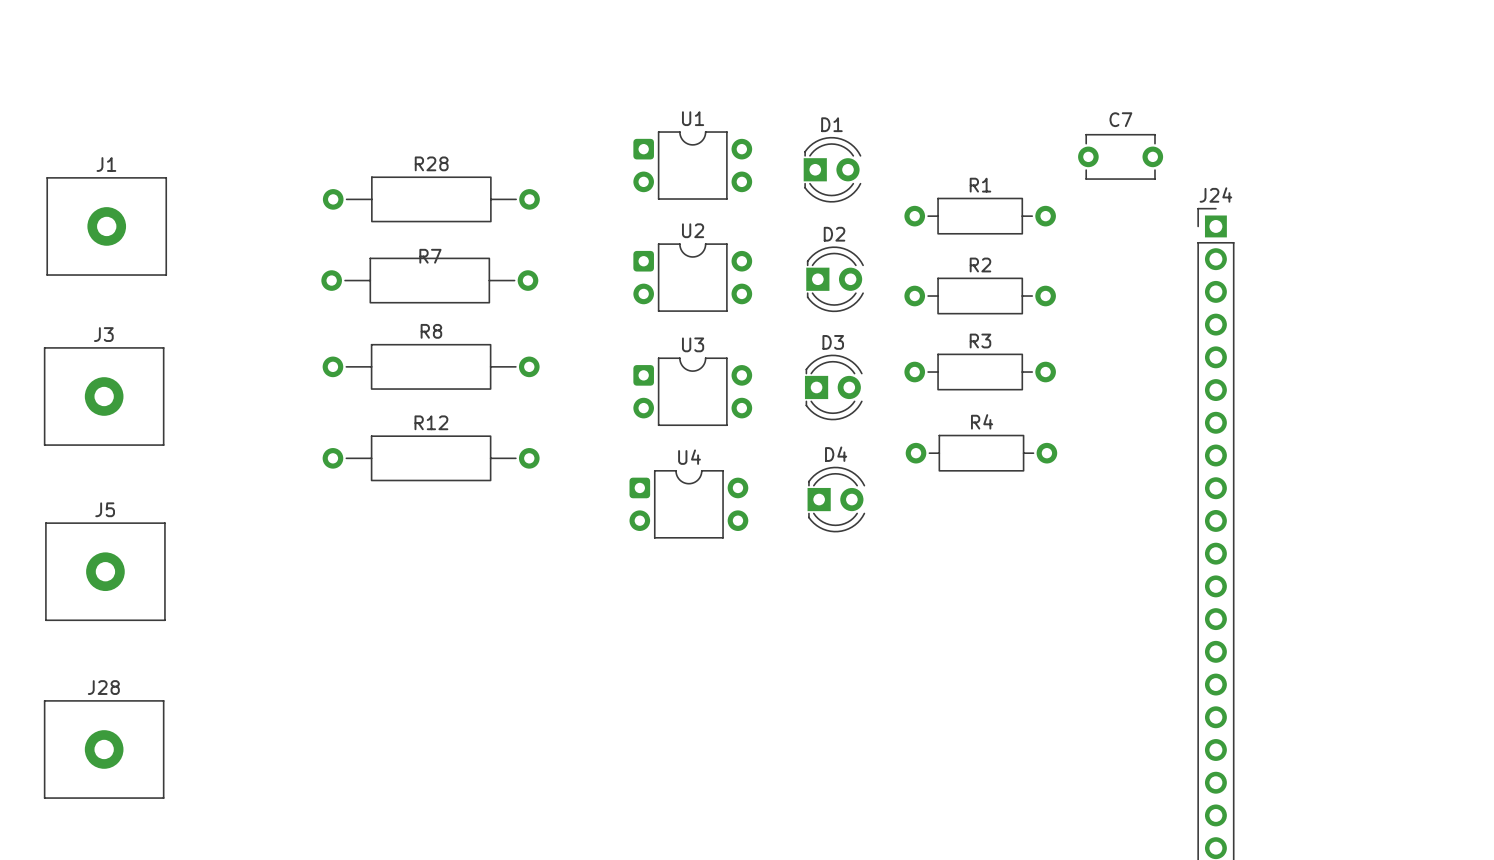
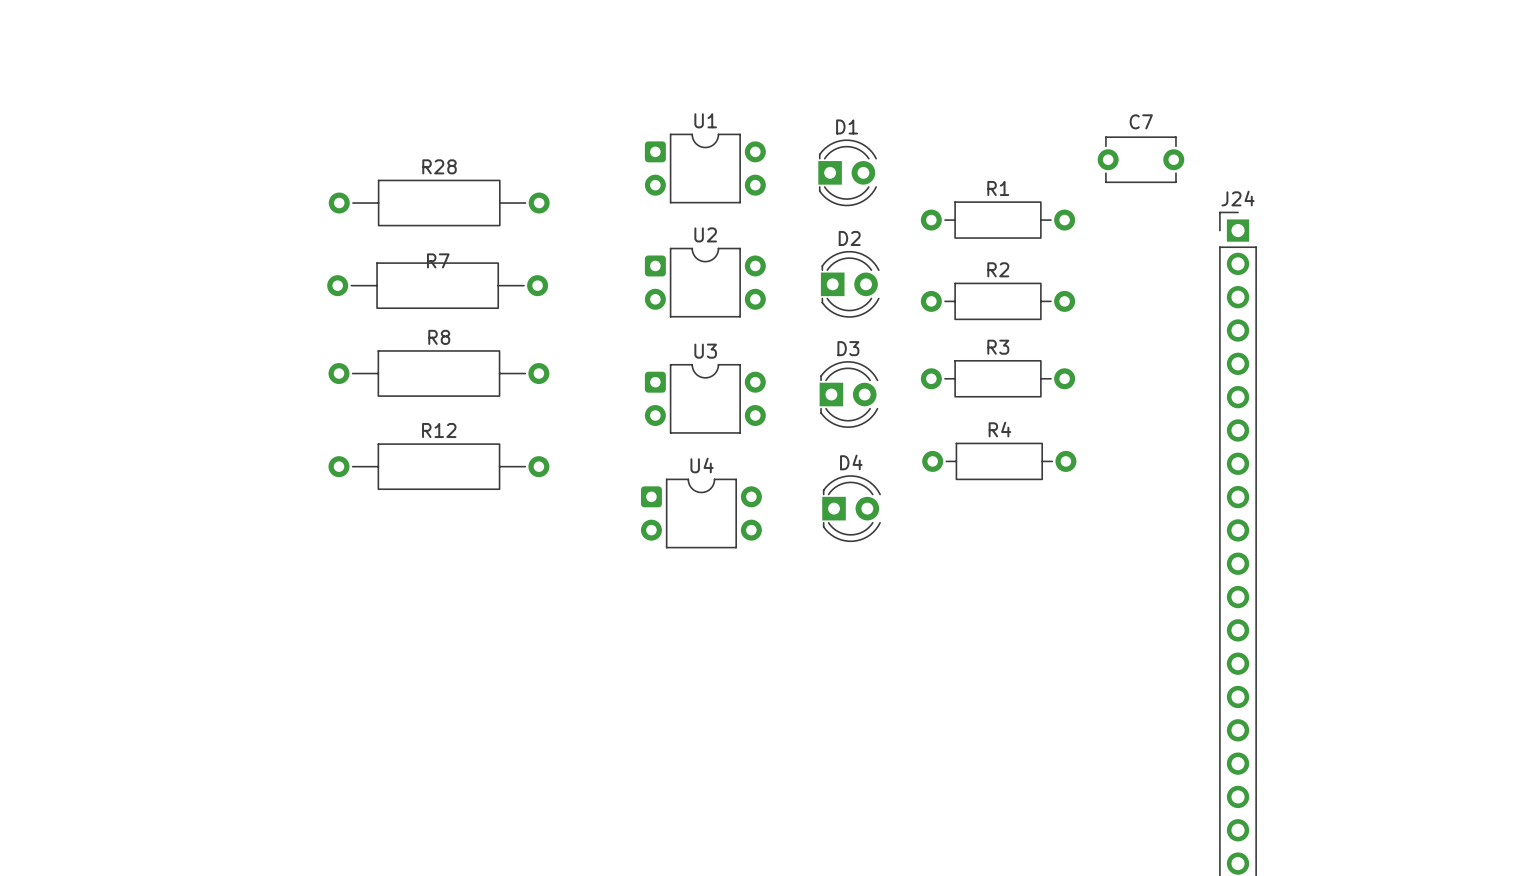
J1: (106, 226) -> none
J3: (104, 396) -> none
J5: (105, 571) -> none
J28: (104, 749) -> none

